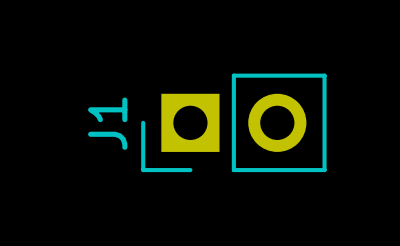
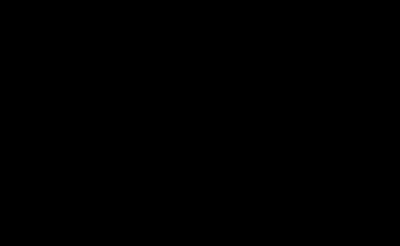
J1: (233, 122) -> none

